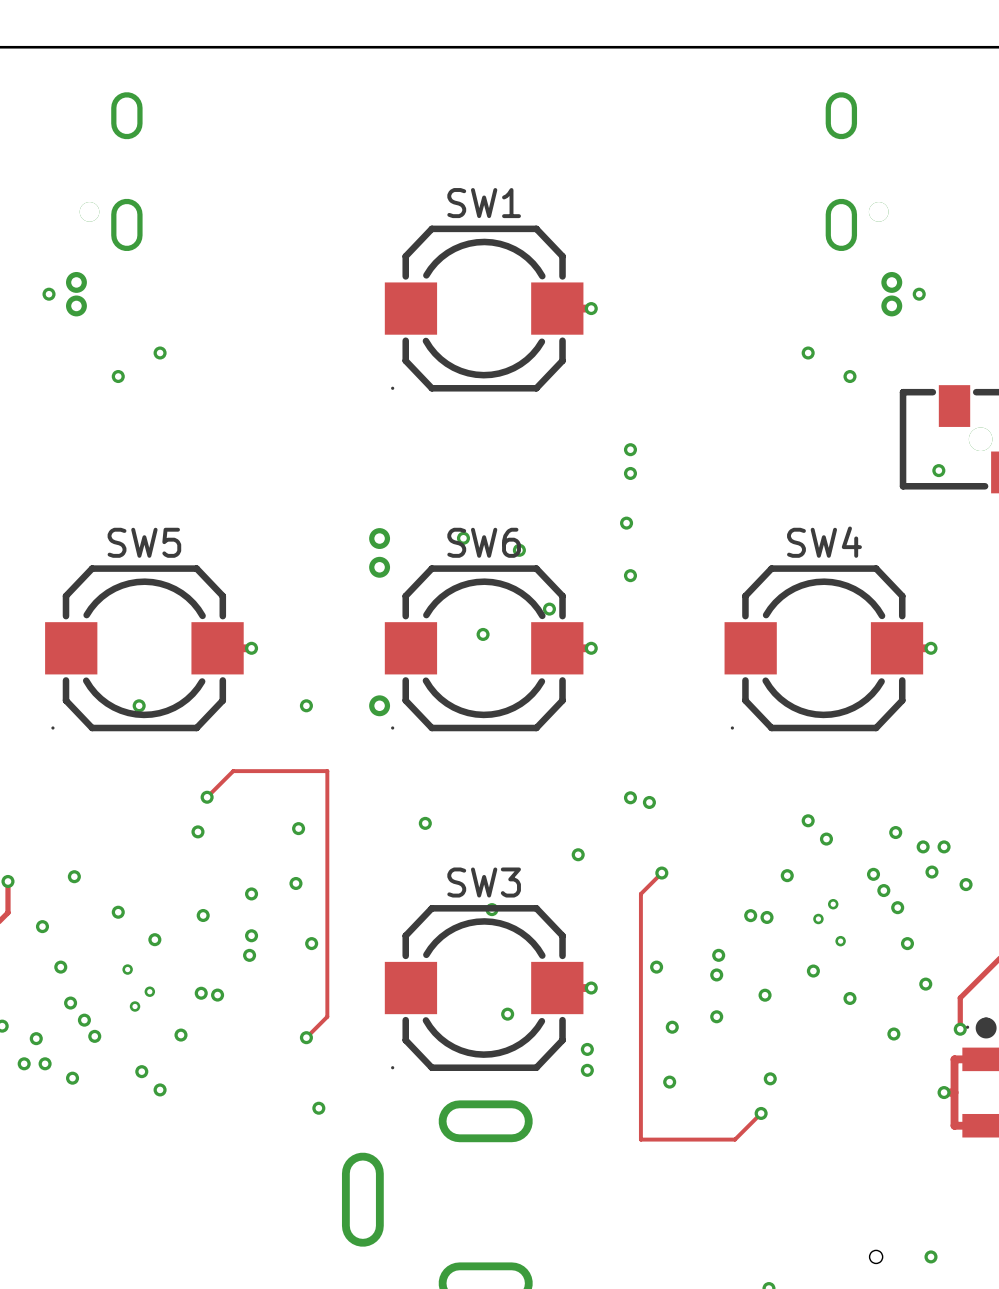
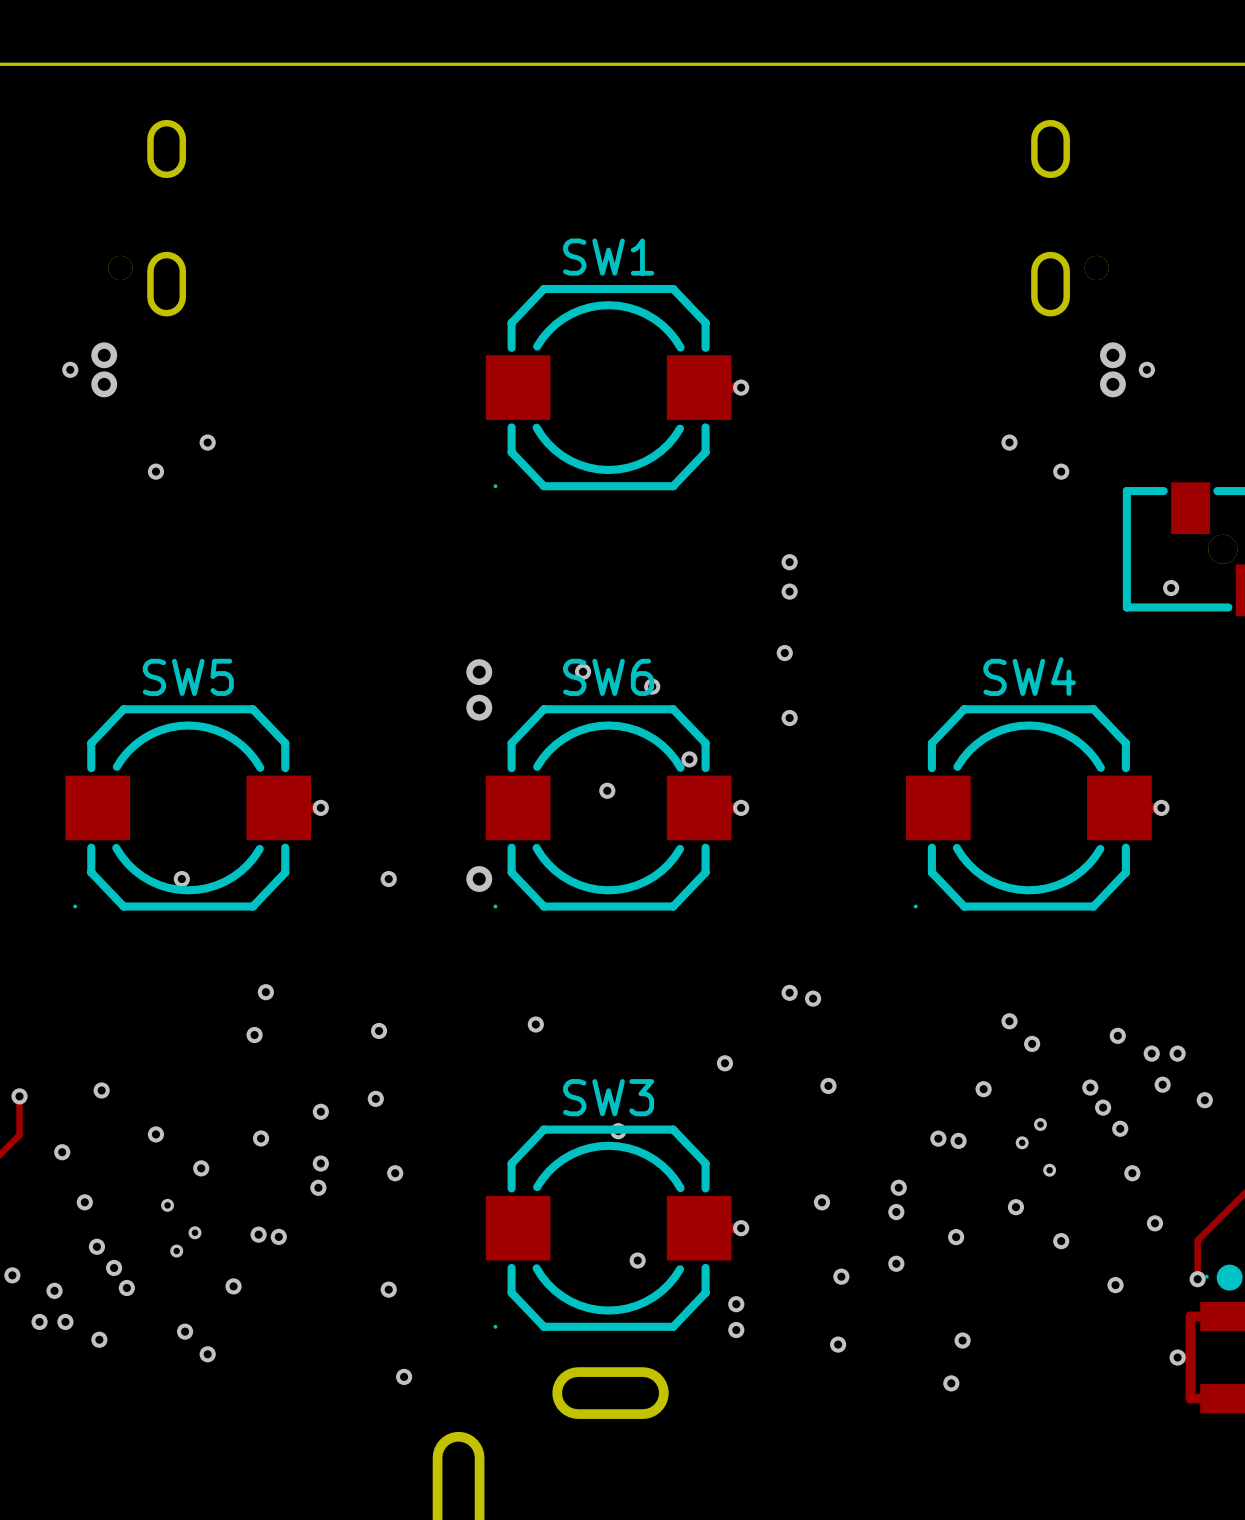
track: (207, 797) (233, 771) (327, 771) (327, 1016) (306, 1037) -> none
track: (661, 873) (640, 893) (640, 1139) (735, 1139) (761, 1113) -> none

